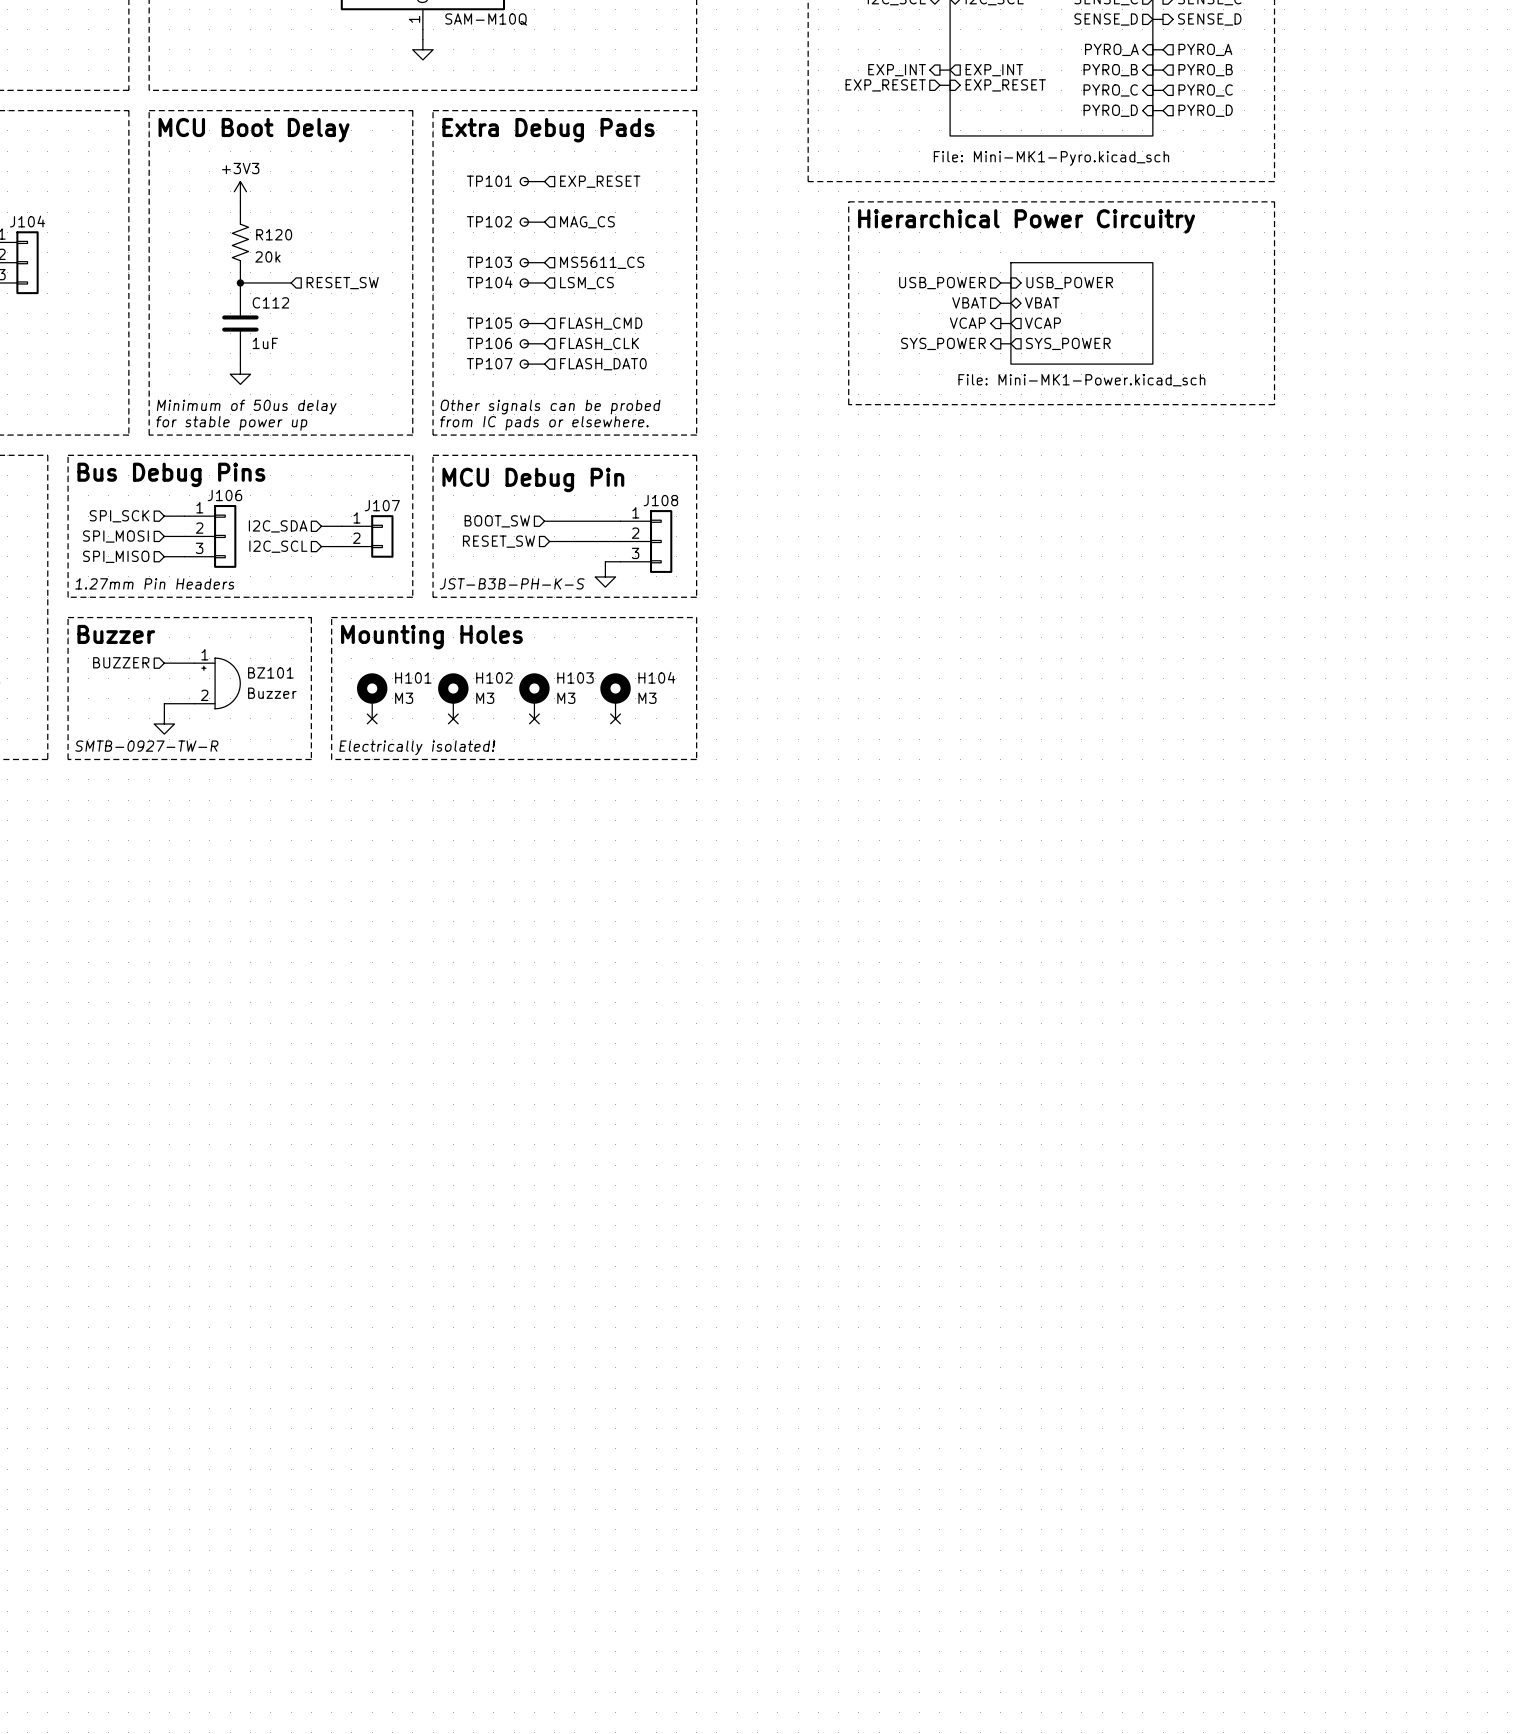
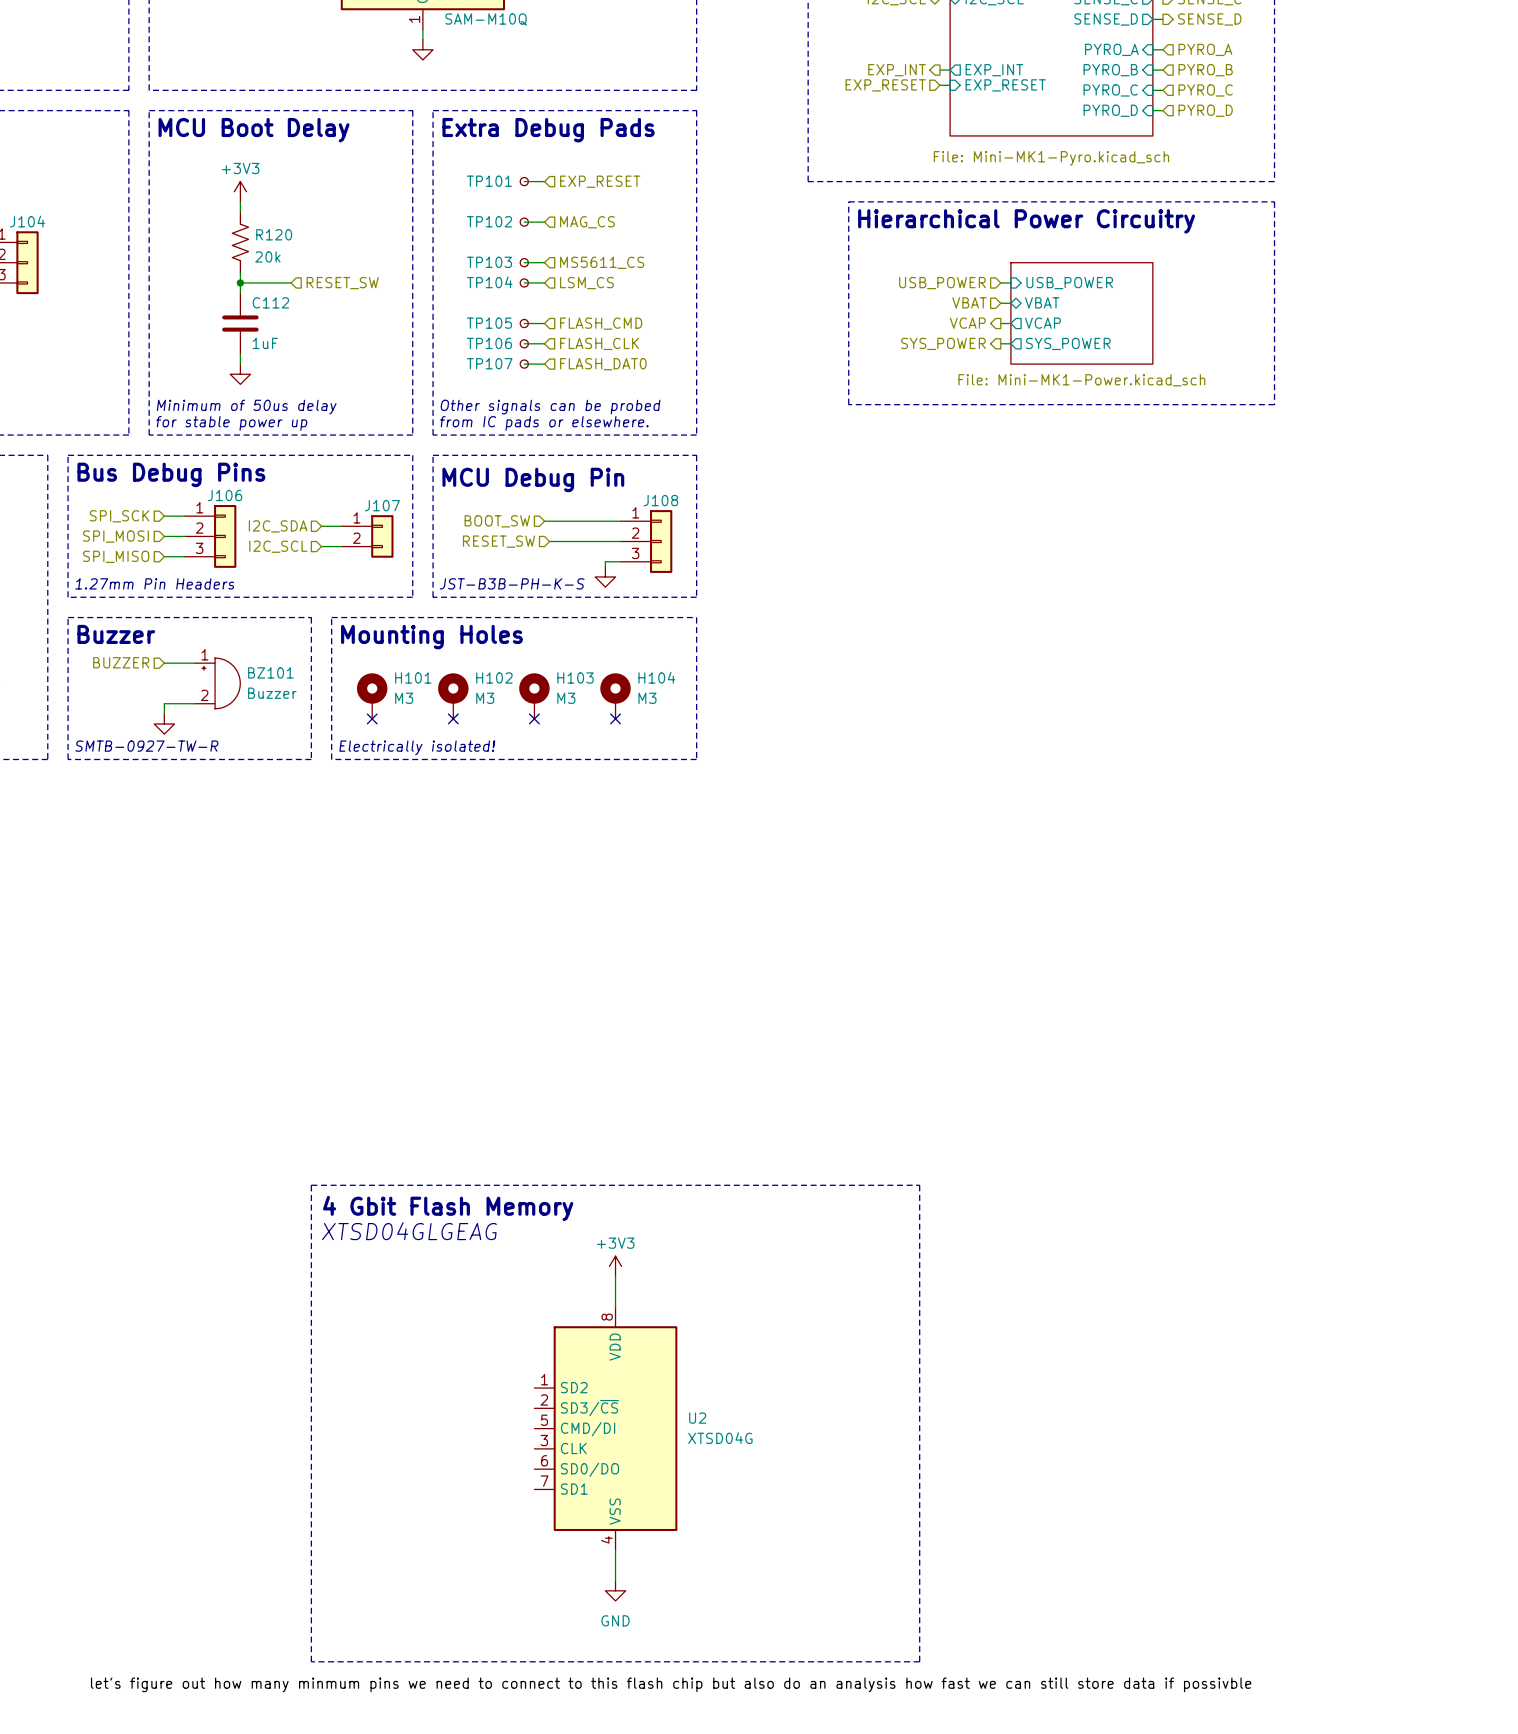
line: none -> (311, 1185) (919, 1185) (919, 1661) (311, 1661) (311, 1185)
text: none -> 4 Gbit Flash Memory (448, 1208)
text: none -> XTSD04GLGEAG (409, 1231)
power symbol: none -> +3V3 (615, 1266)
wire: none -> (615, 1276) (615, 1306)
U2: none -> XTSD04G (605, 1428)
wire: none -> (615, 1550) (615, 1580)
power symbol: none -> GND (615, 1590)
label: none -> let's figure out how many minmum pins we need to connect to this flash chip but also do an analysis how fast we can still store data if possivble (671, 1684)

